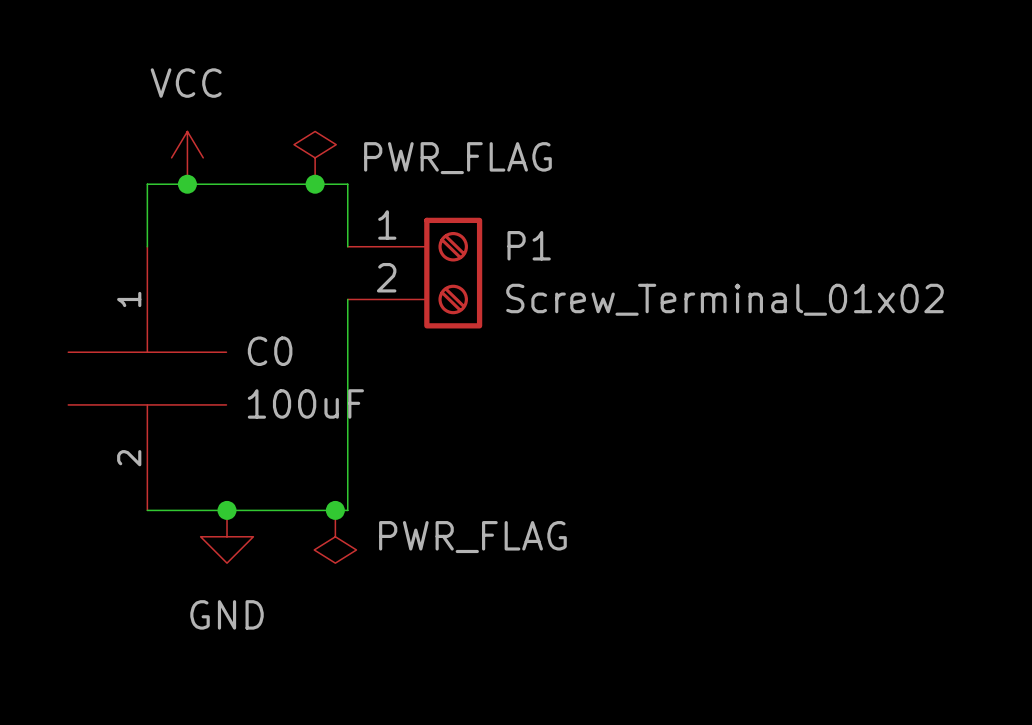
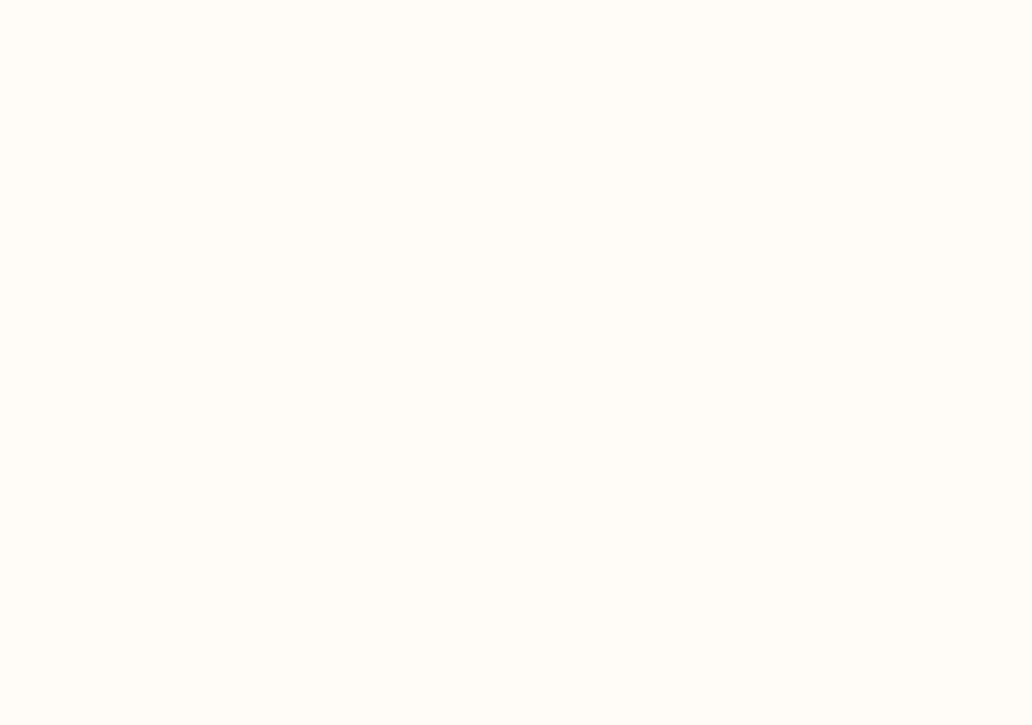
power symbol: VCC (187, 157) -> none
power symbol: PWR_FLAG (315, 157) -> none
junction: (187, 184) -> none
junction: (315, 184) -> none
wire: (147, 246) (147, 184) (347, 184) (347, 246) -> none
P1: Screw_Terminal_01x02 (414, 273) -> none
wire: (347, 299) (347, 510) (147, 510) -> none
C0: 100uF (147, 378) -> none
junction: (227, 510) -> none
junction: (335, 510) -> none
power symbol: GND (227, 536) -> none
power symbol: PWR_FLAG (335, 536) -> none

